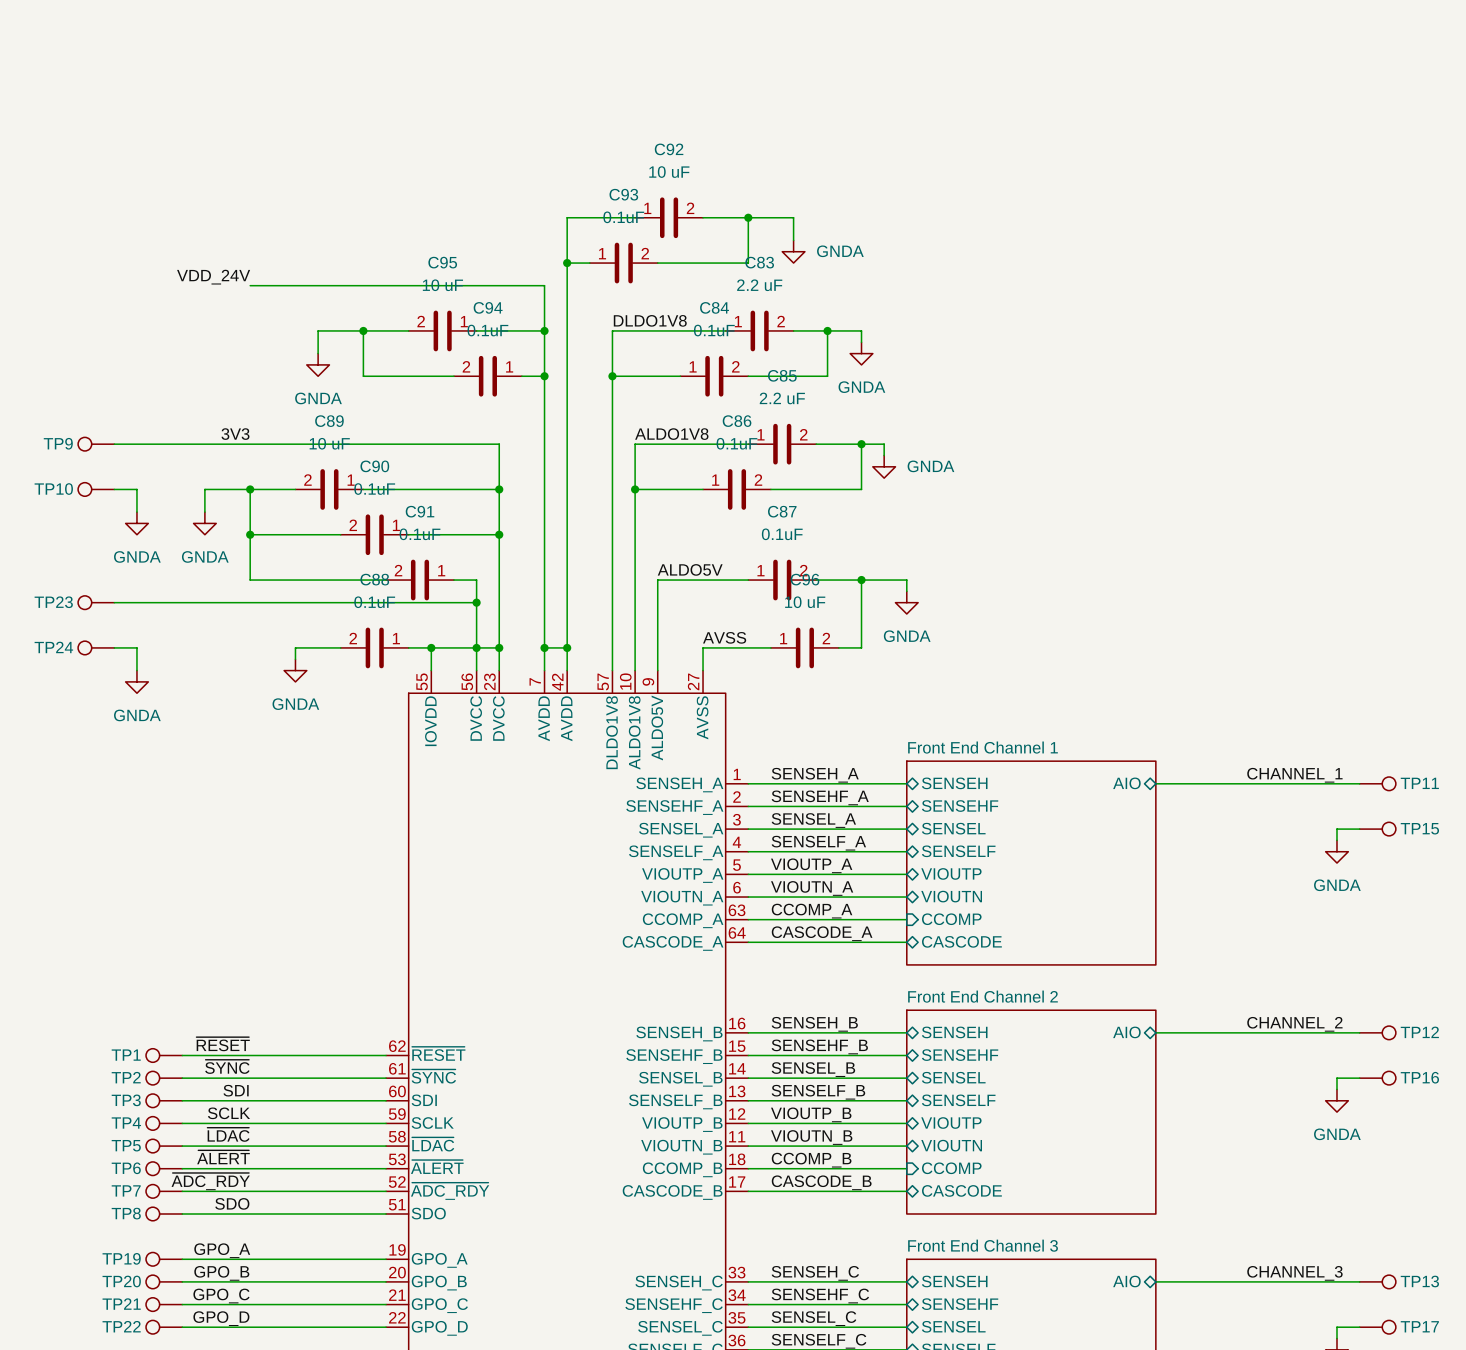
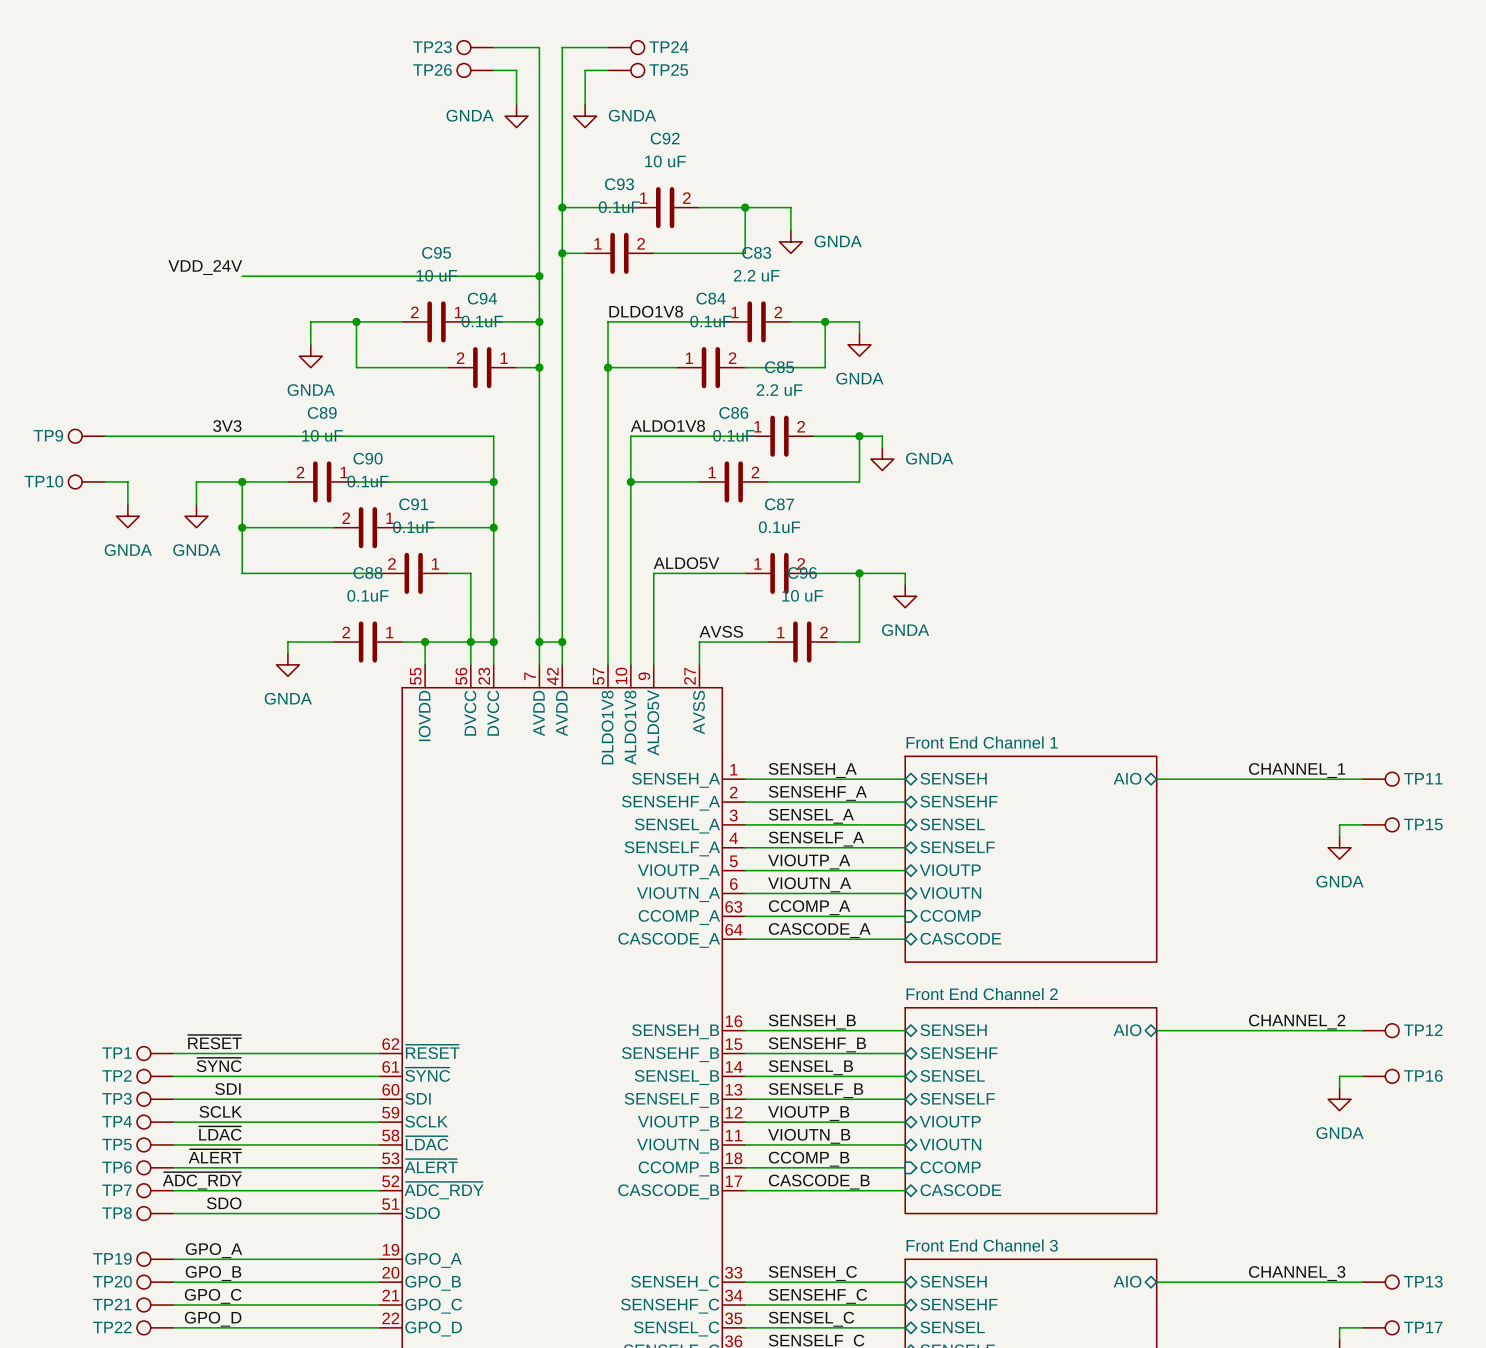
wire: none -> (493, 47) (539, 47) (539, 276)
wire: none -> (608, 47) (562, 47) (562, 207)
TP26: none -> (475, 70)
wire: none -> (493, 70) (516, 70) (516, 104)
wire: none -> (608, 70) (585, 70) (585, 104)
TP25: none -> (626, 70)
power symbol: none -> GNDA (516, 116)
power symbol: none -> GNDA (585, 116)
junction: none -> (562, 207)
junction: none -> (539, 276)
TP23 position: (96, 602) -> (475, 47)
wire: (114, 602) (476, 602) -> none
junction: (476, 602) -> none
TP24 rotation: 0° (84, 647) -> 180° (637, 47)
TP24 position: (96, 647) -> (626, 47)
wire: (114, 647) (136, 647) (136, 670) -> none
power symbol: GNDA (136, 681) -> none

